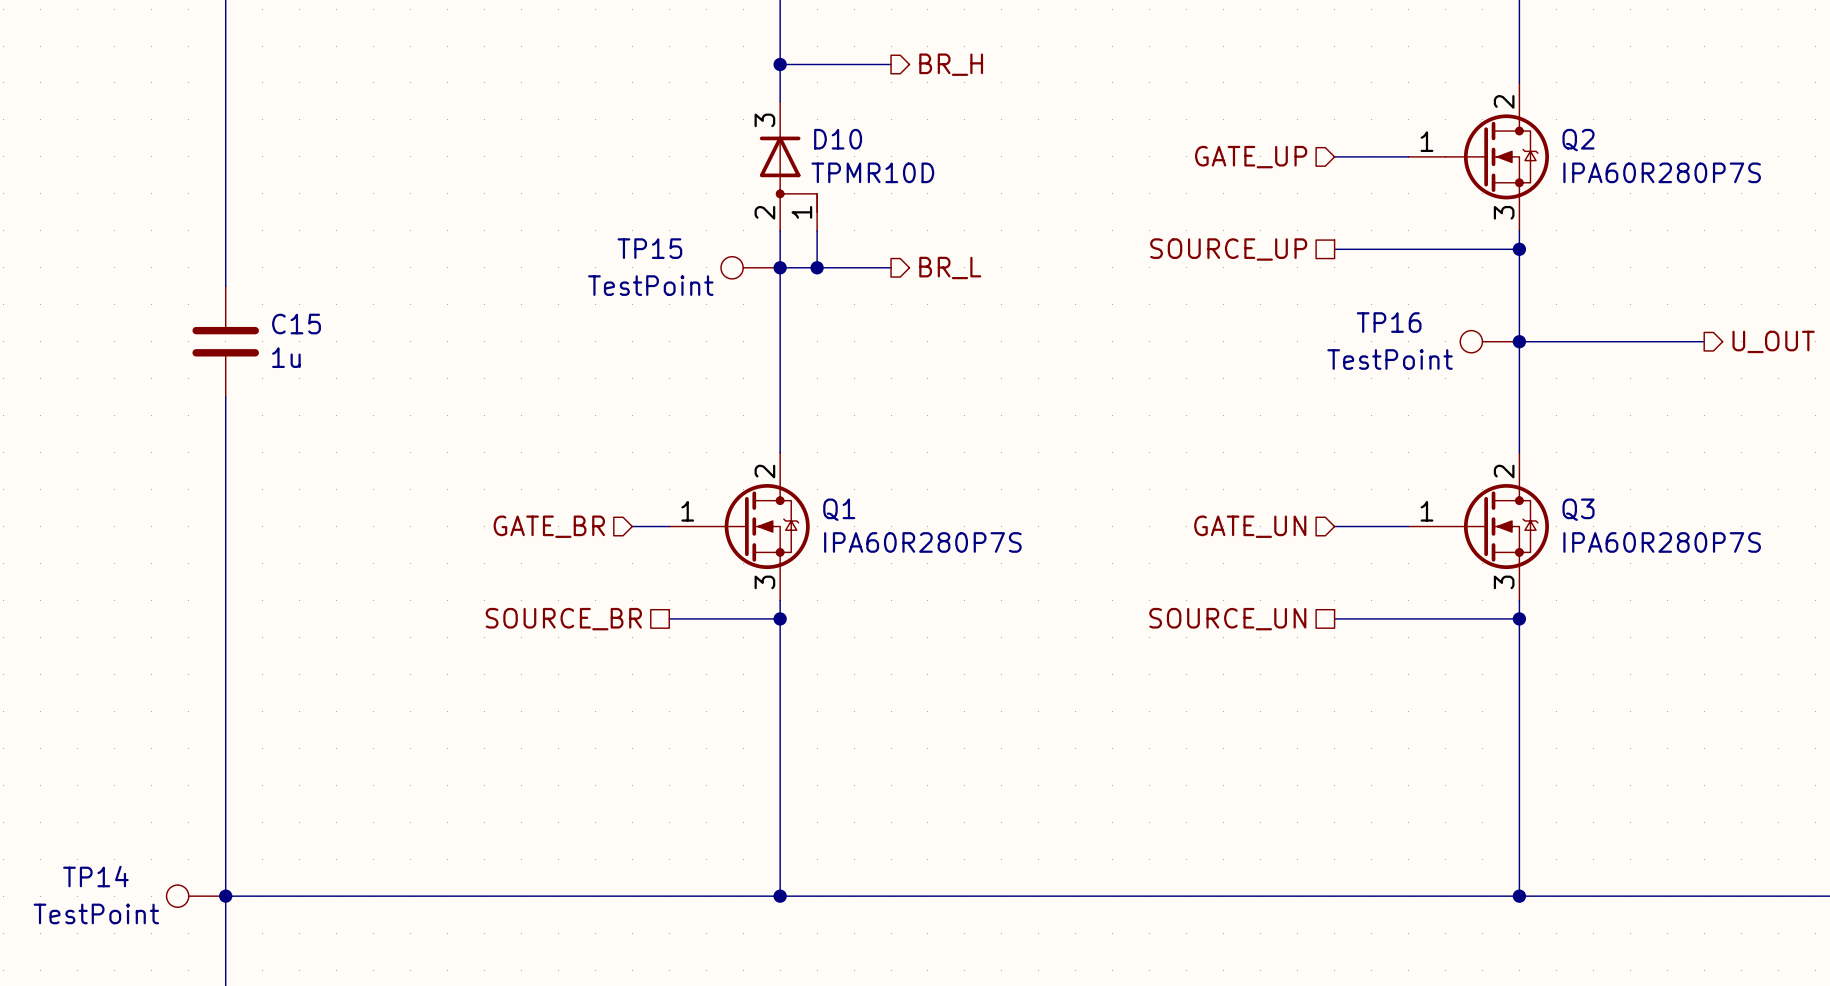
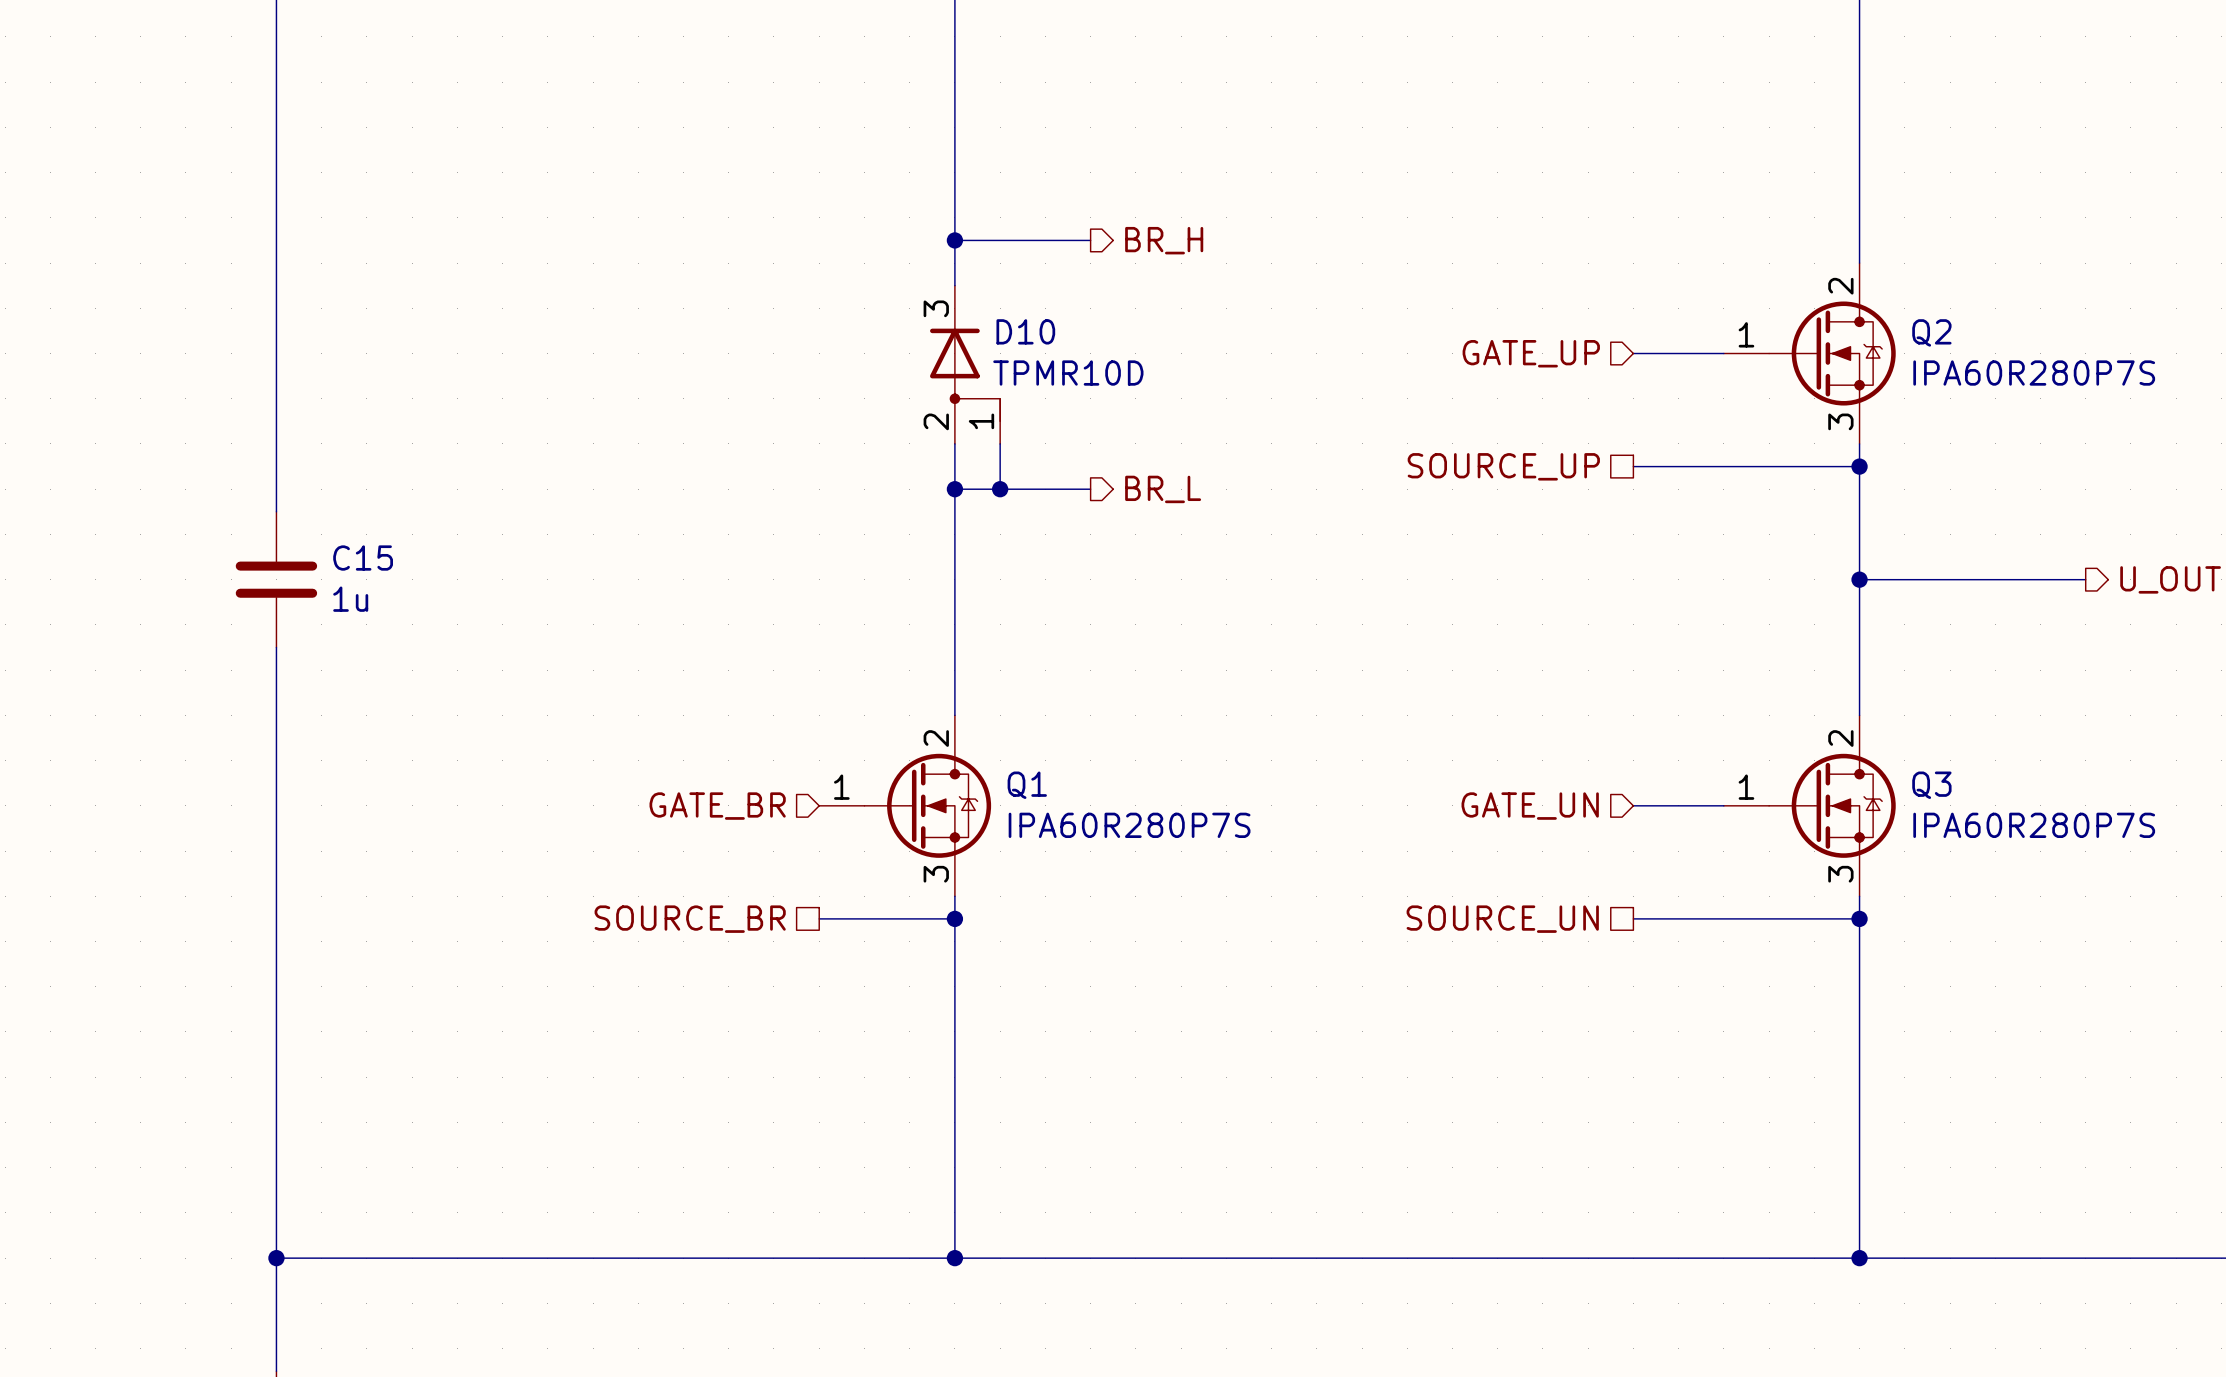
TP15: TestPoint (750, 267) -> none
TP16: TestPoint (1489, 341) -> none
hierarchical label position: GATE_BR (549, 526) -> GATE_BR (717, 806)
wire: (632, 526) (669, 526) -> none
TP14: TestPoint (196, 896) -> none

